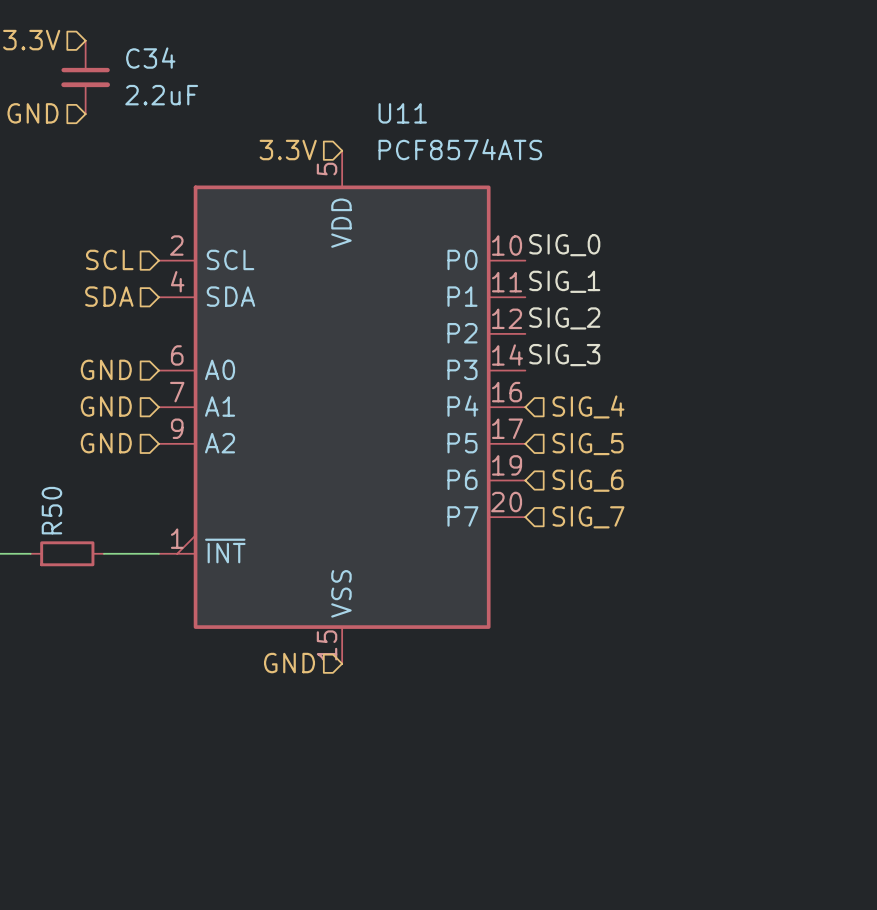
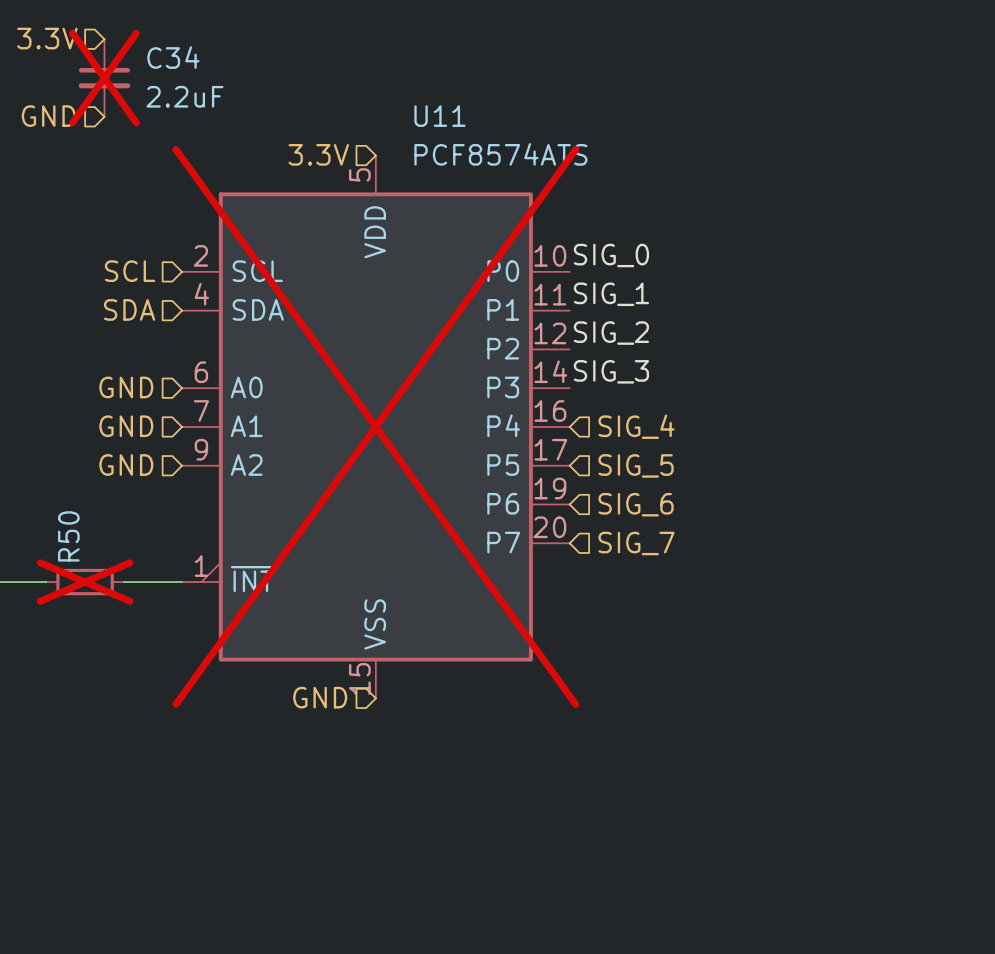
C34 do-not-place cross: none -> (104, 78)
U11 do-not-place cross: none -> (375, 426)
R50 do-not-place cross: none -> (85, 582)

